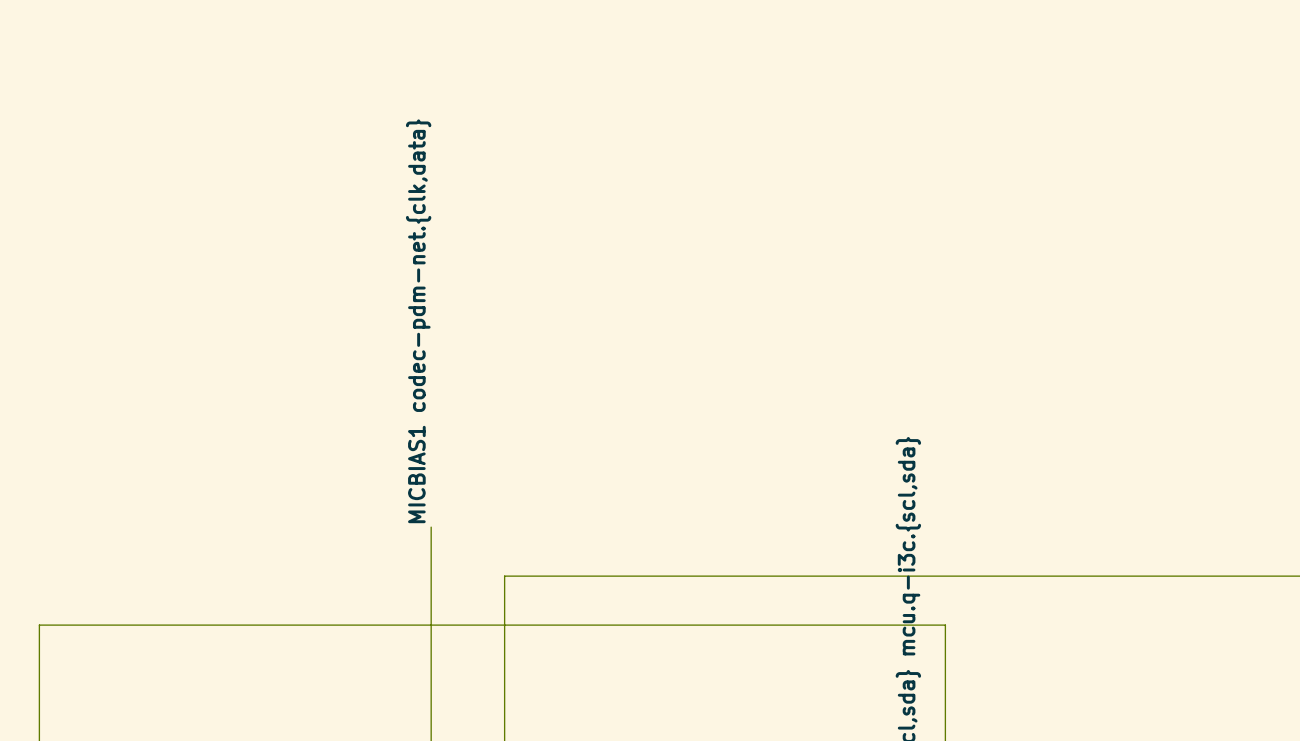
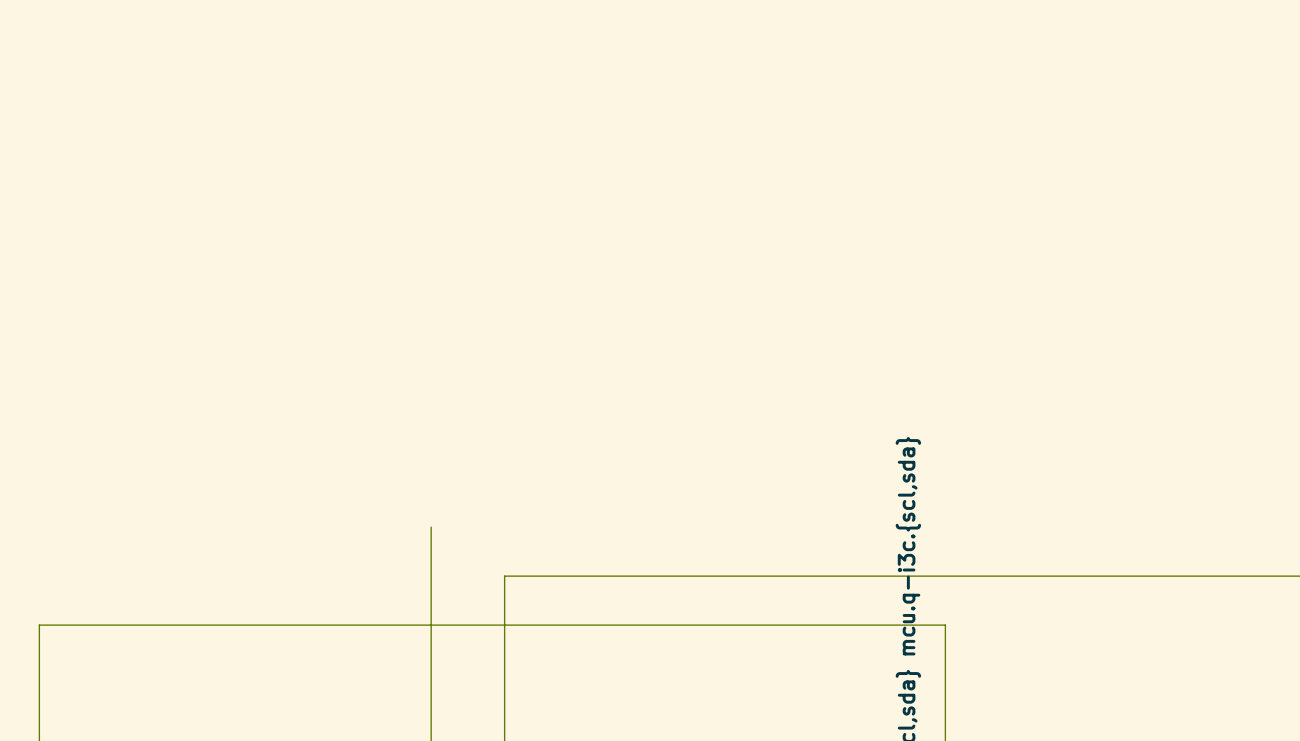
label: MICBIAS1 codec-pdm-net.{clk,data} (418, 321) -> none

